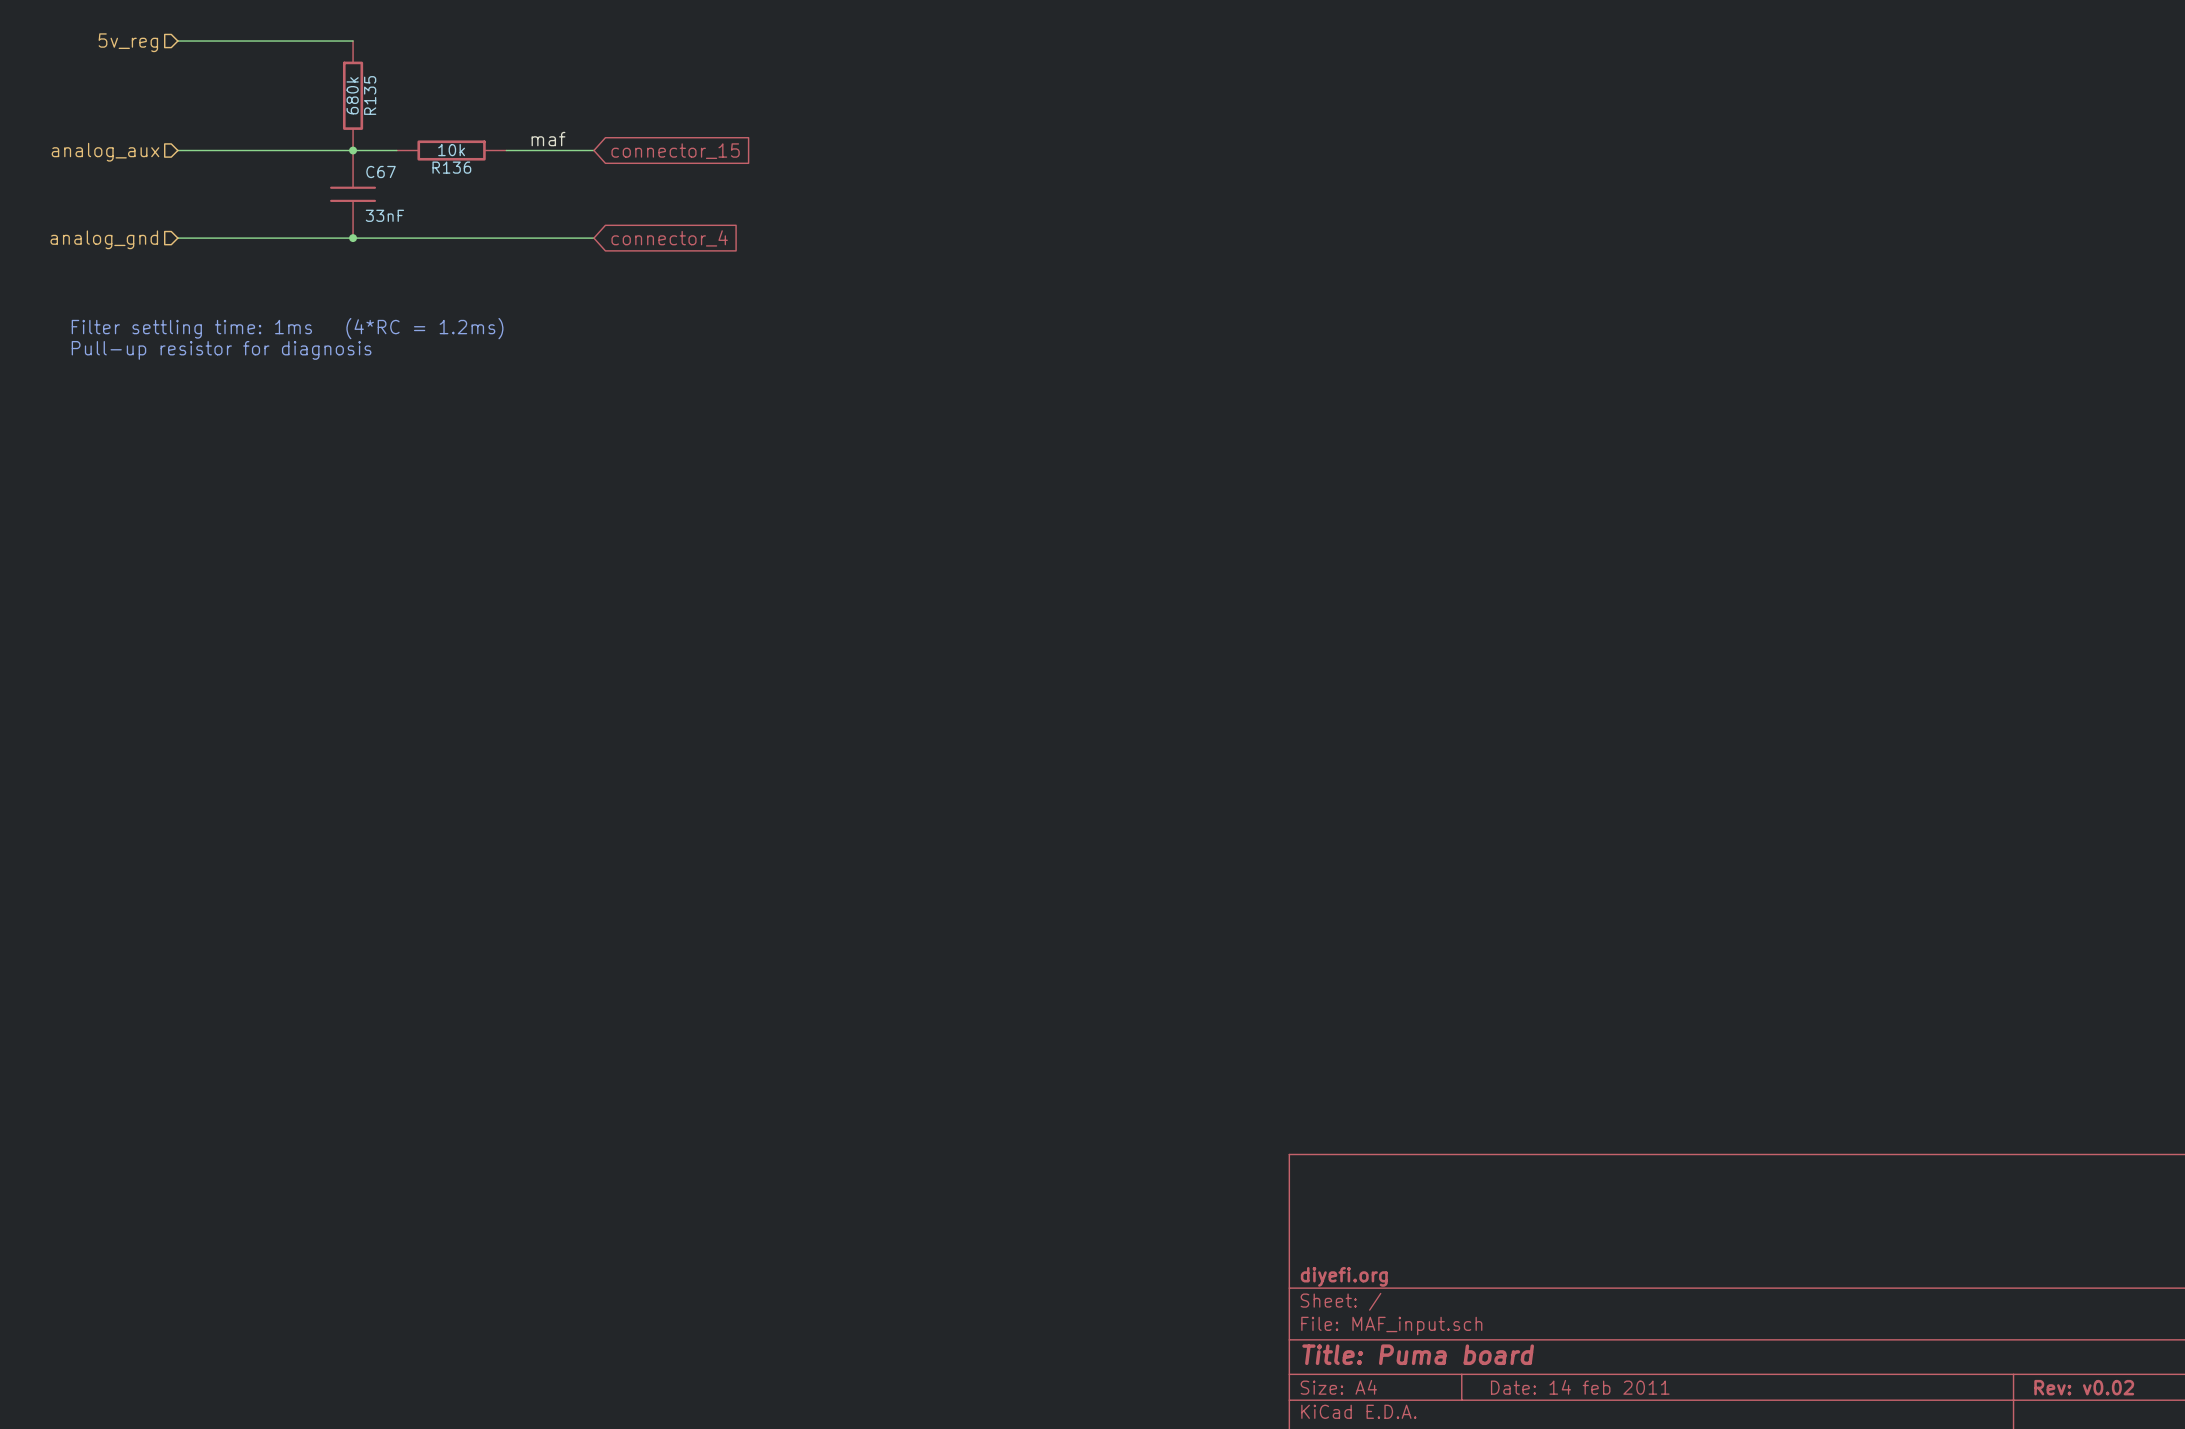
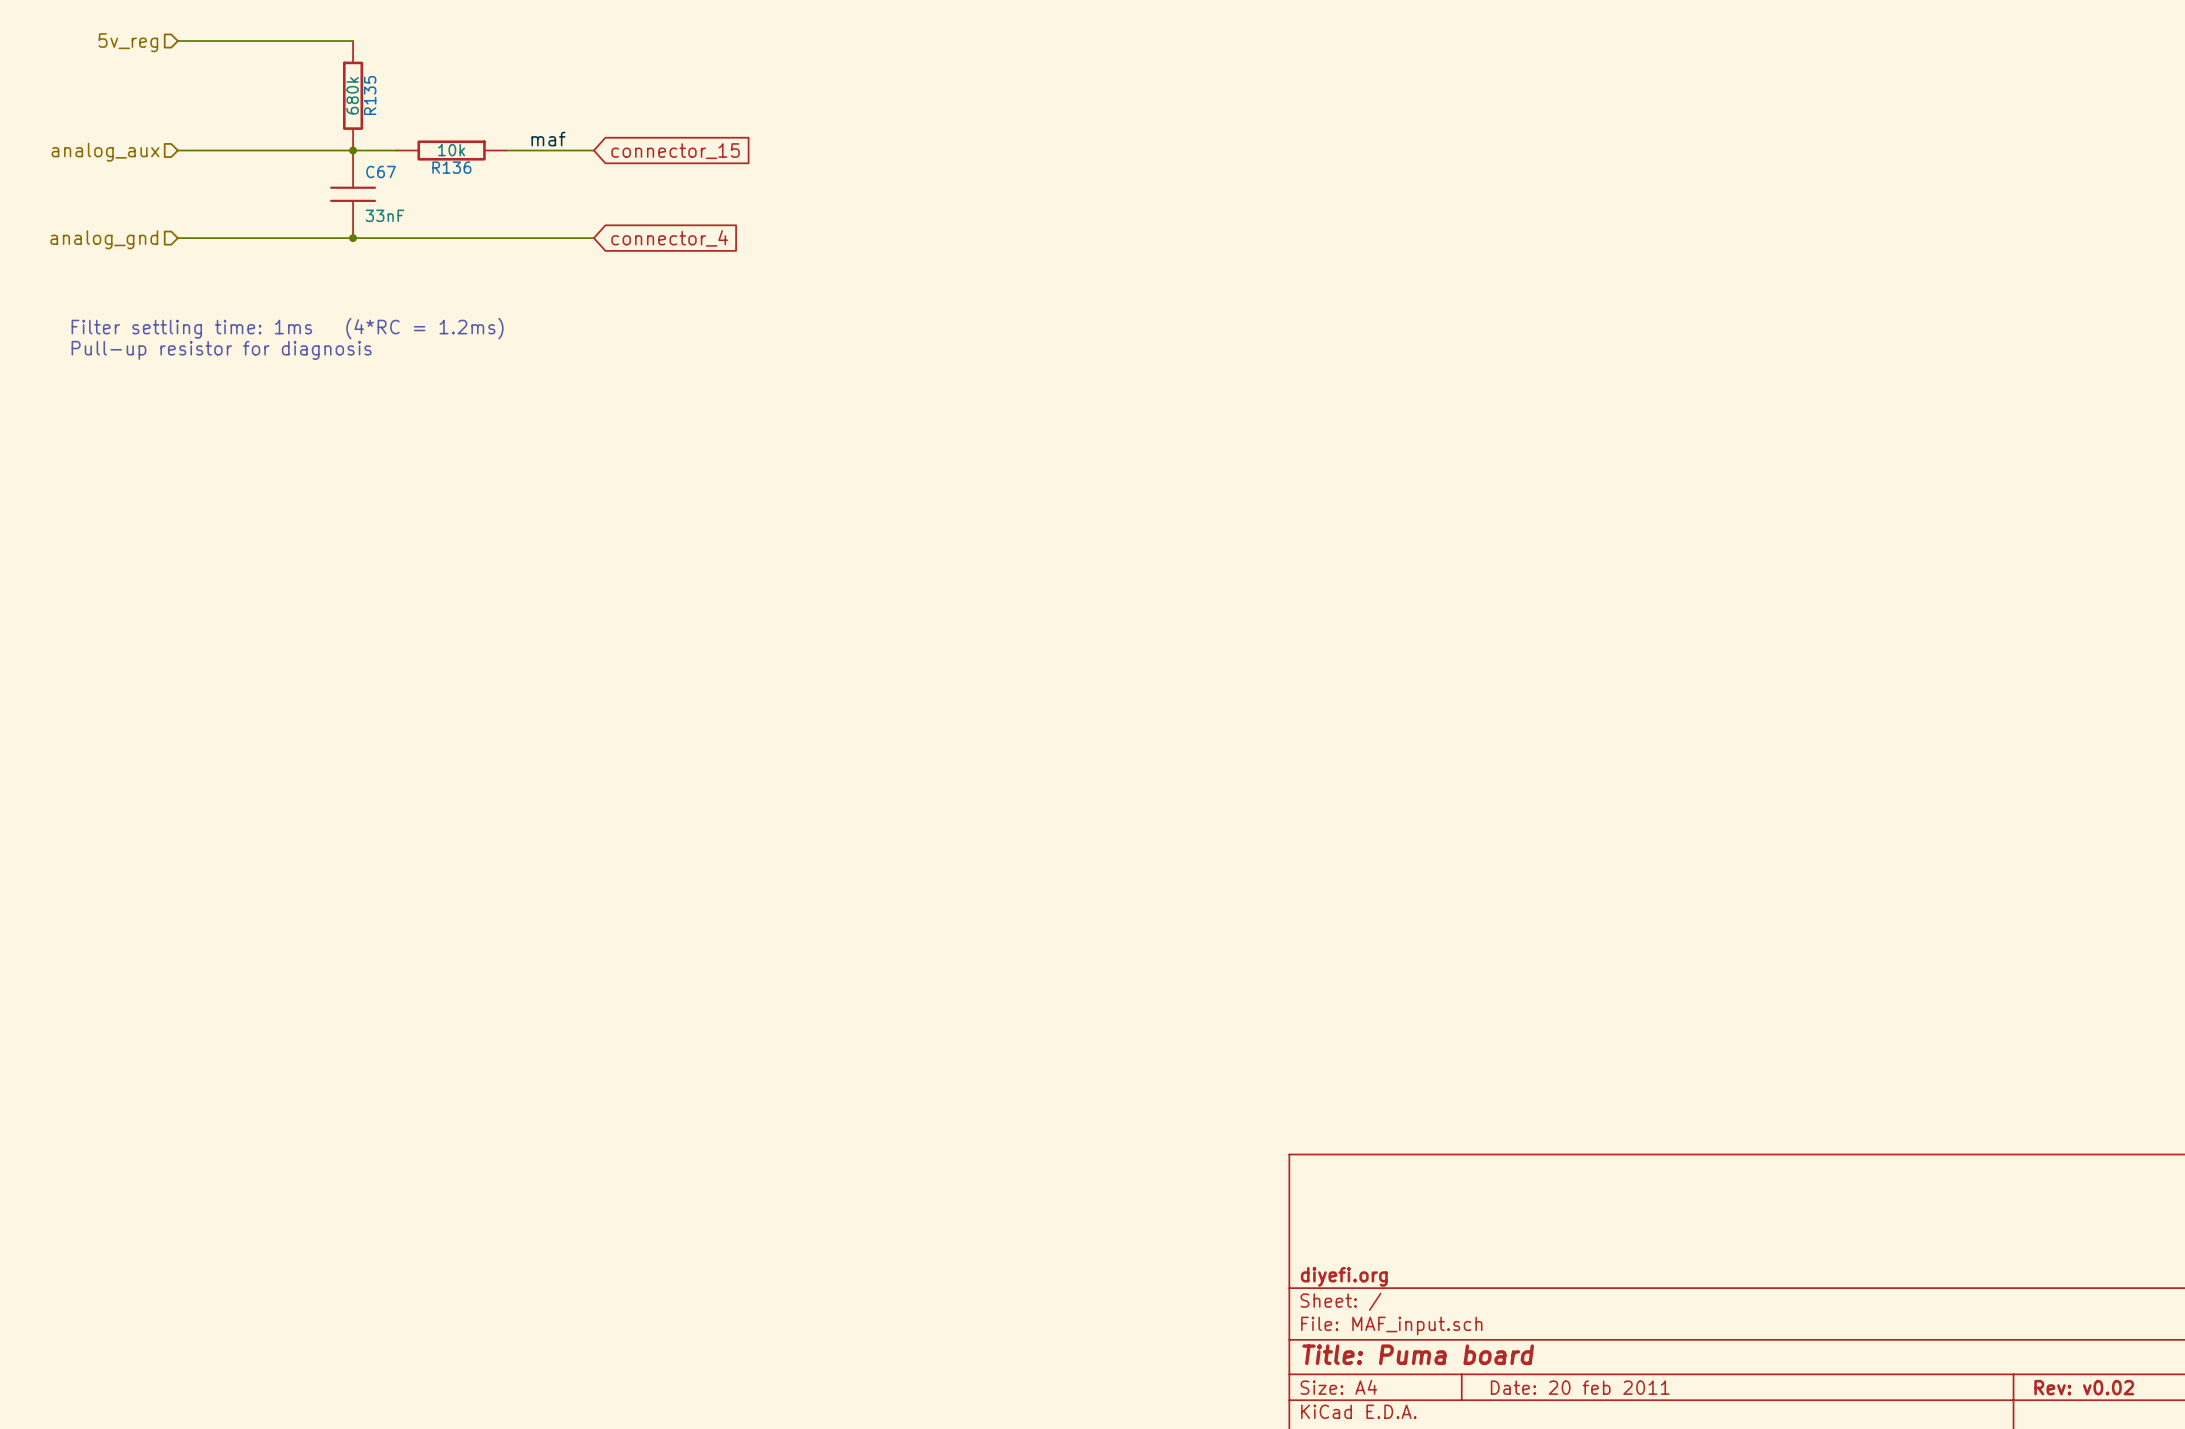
title block: Date: 14 feb 2011 (1580, 1387) -> Date: 20 feb 2011 (1580, 1387)

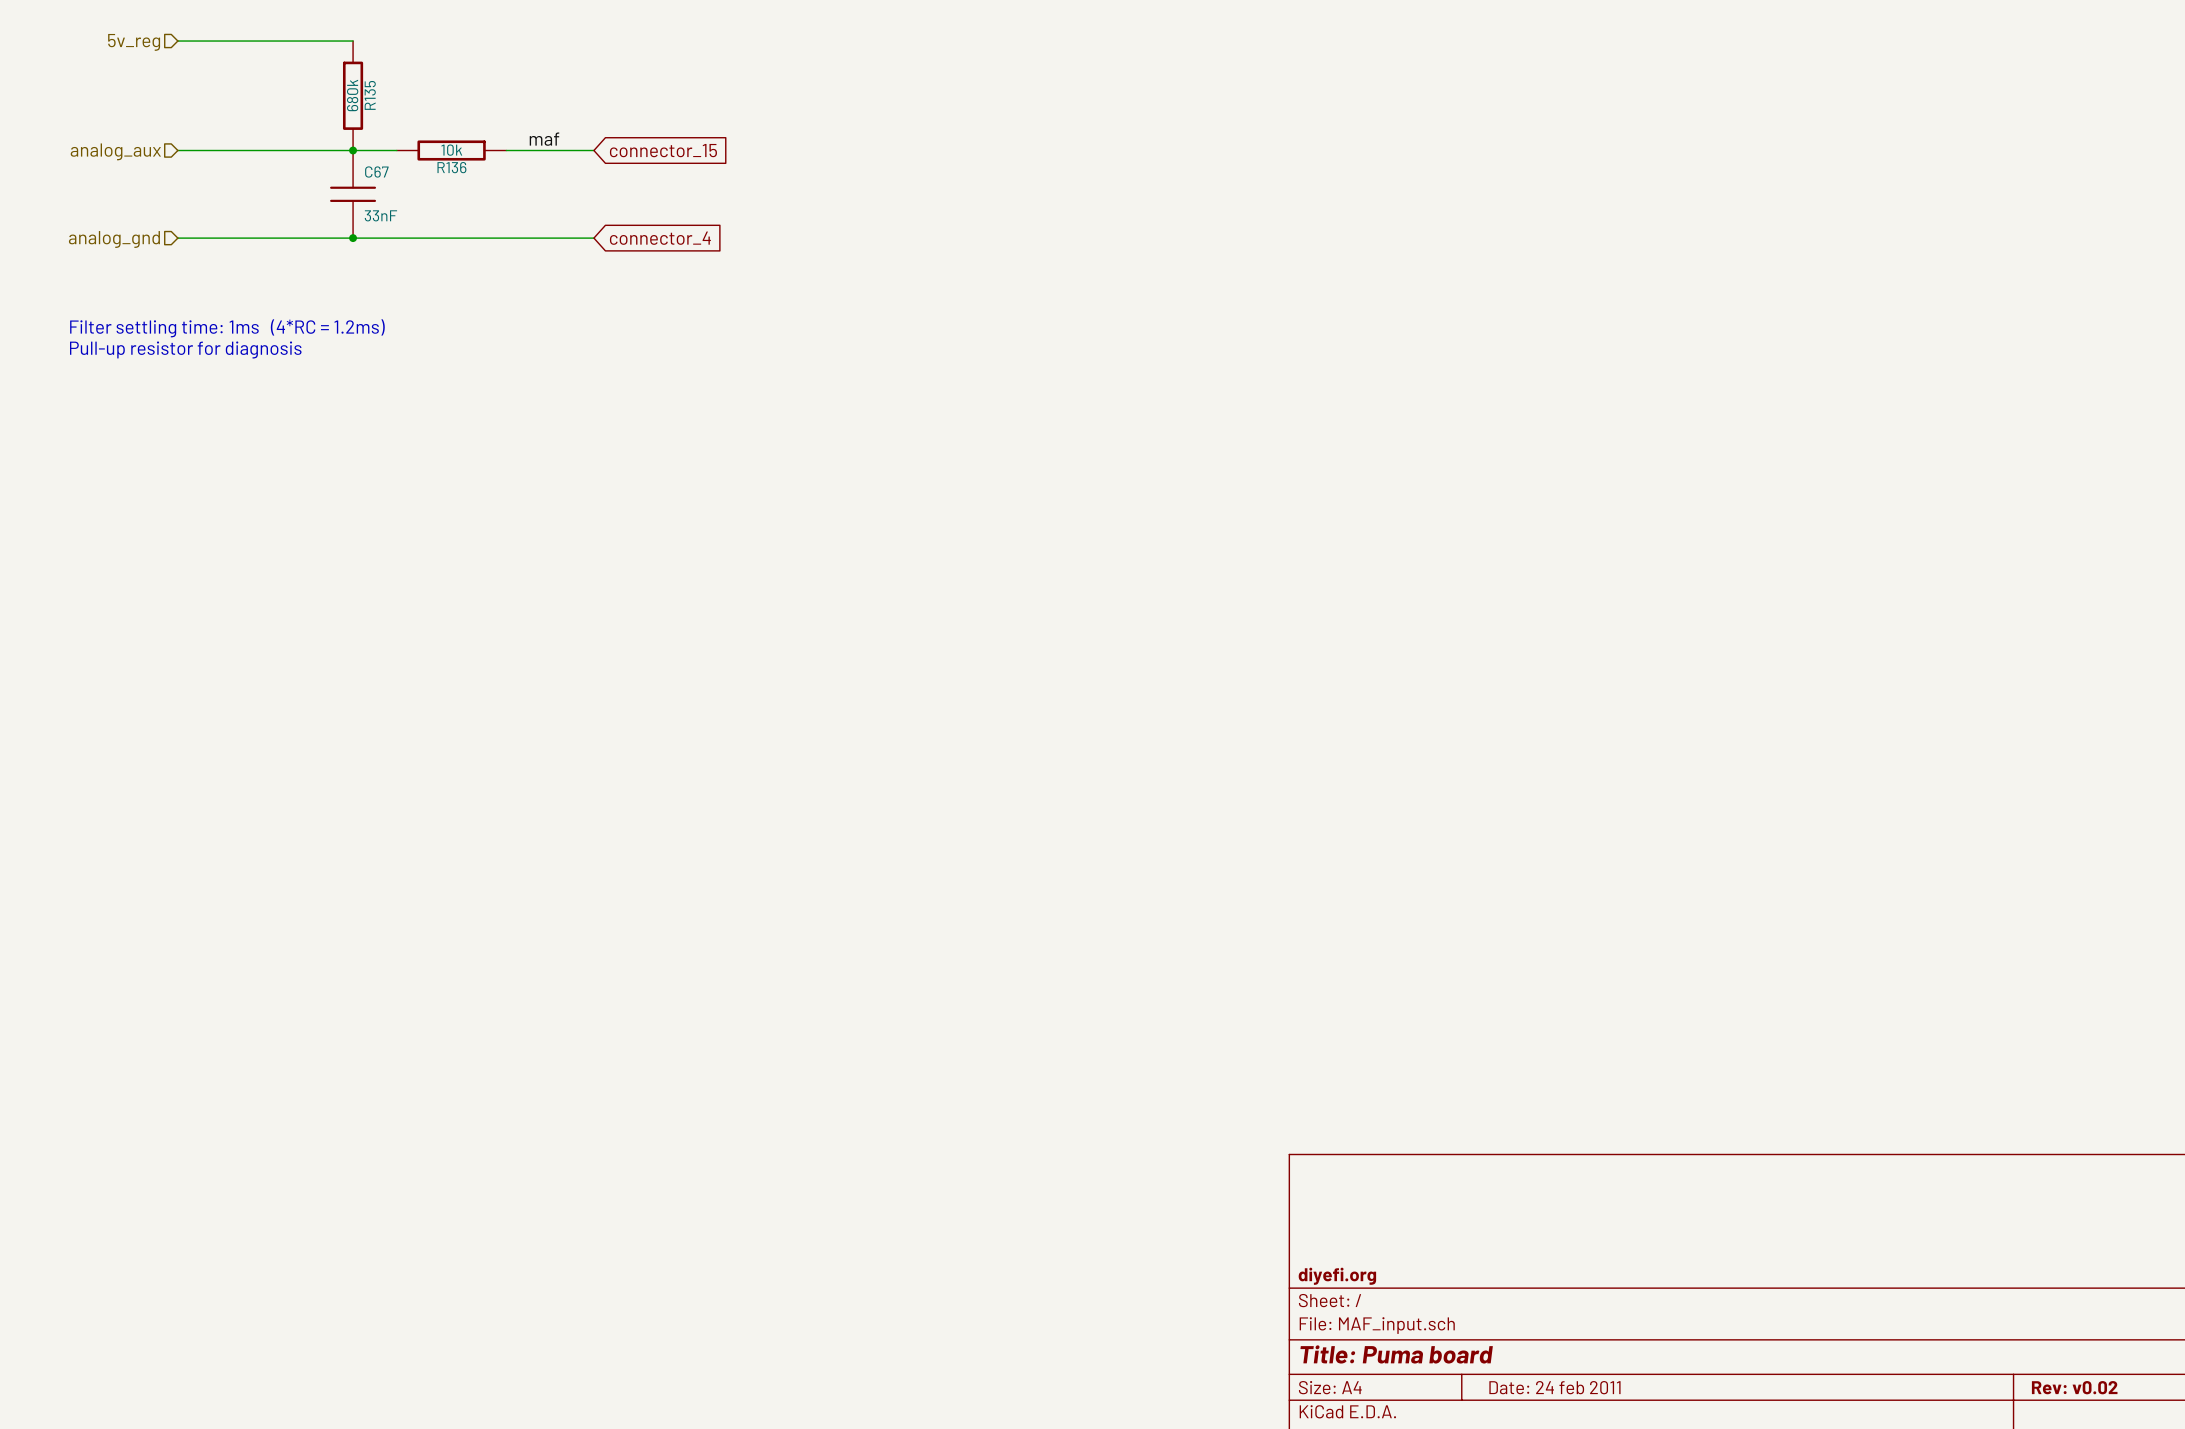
title block: Date: 20 feb 2011 (1580, 1387) -> Date: 24 feb 2011 (1554, 1387)

